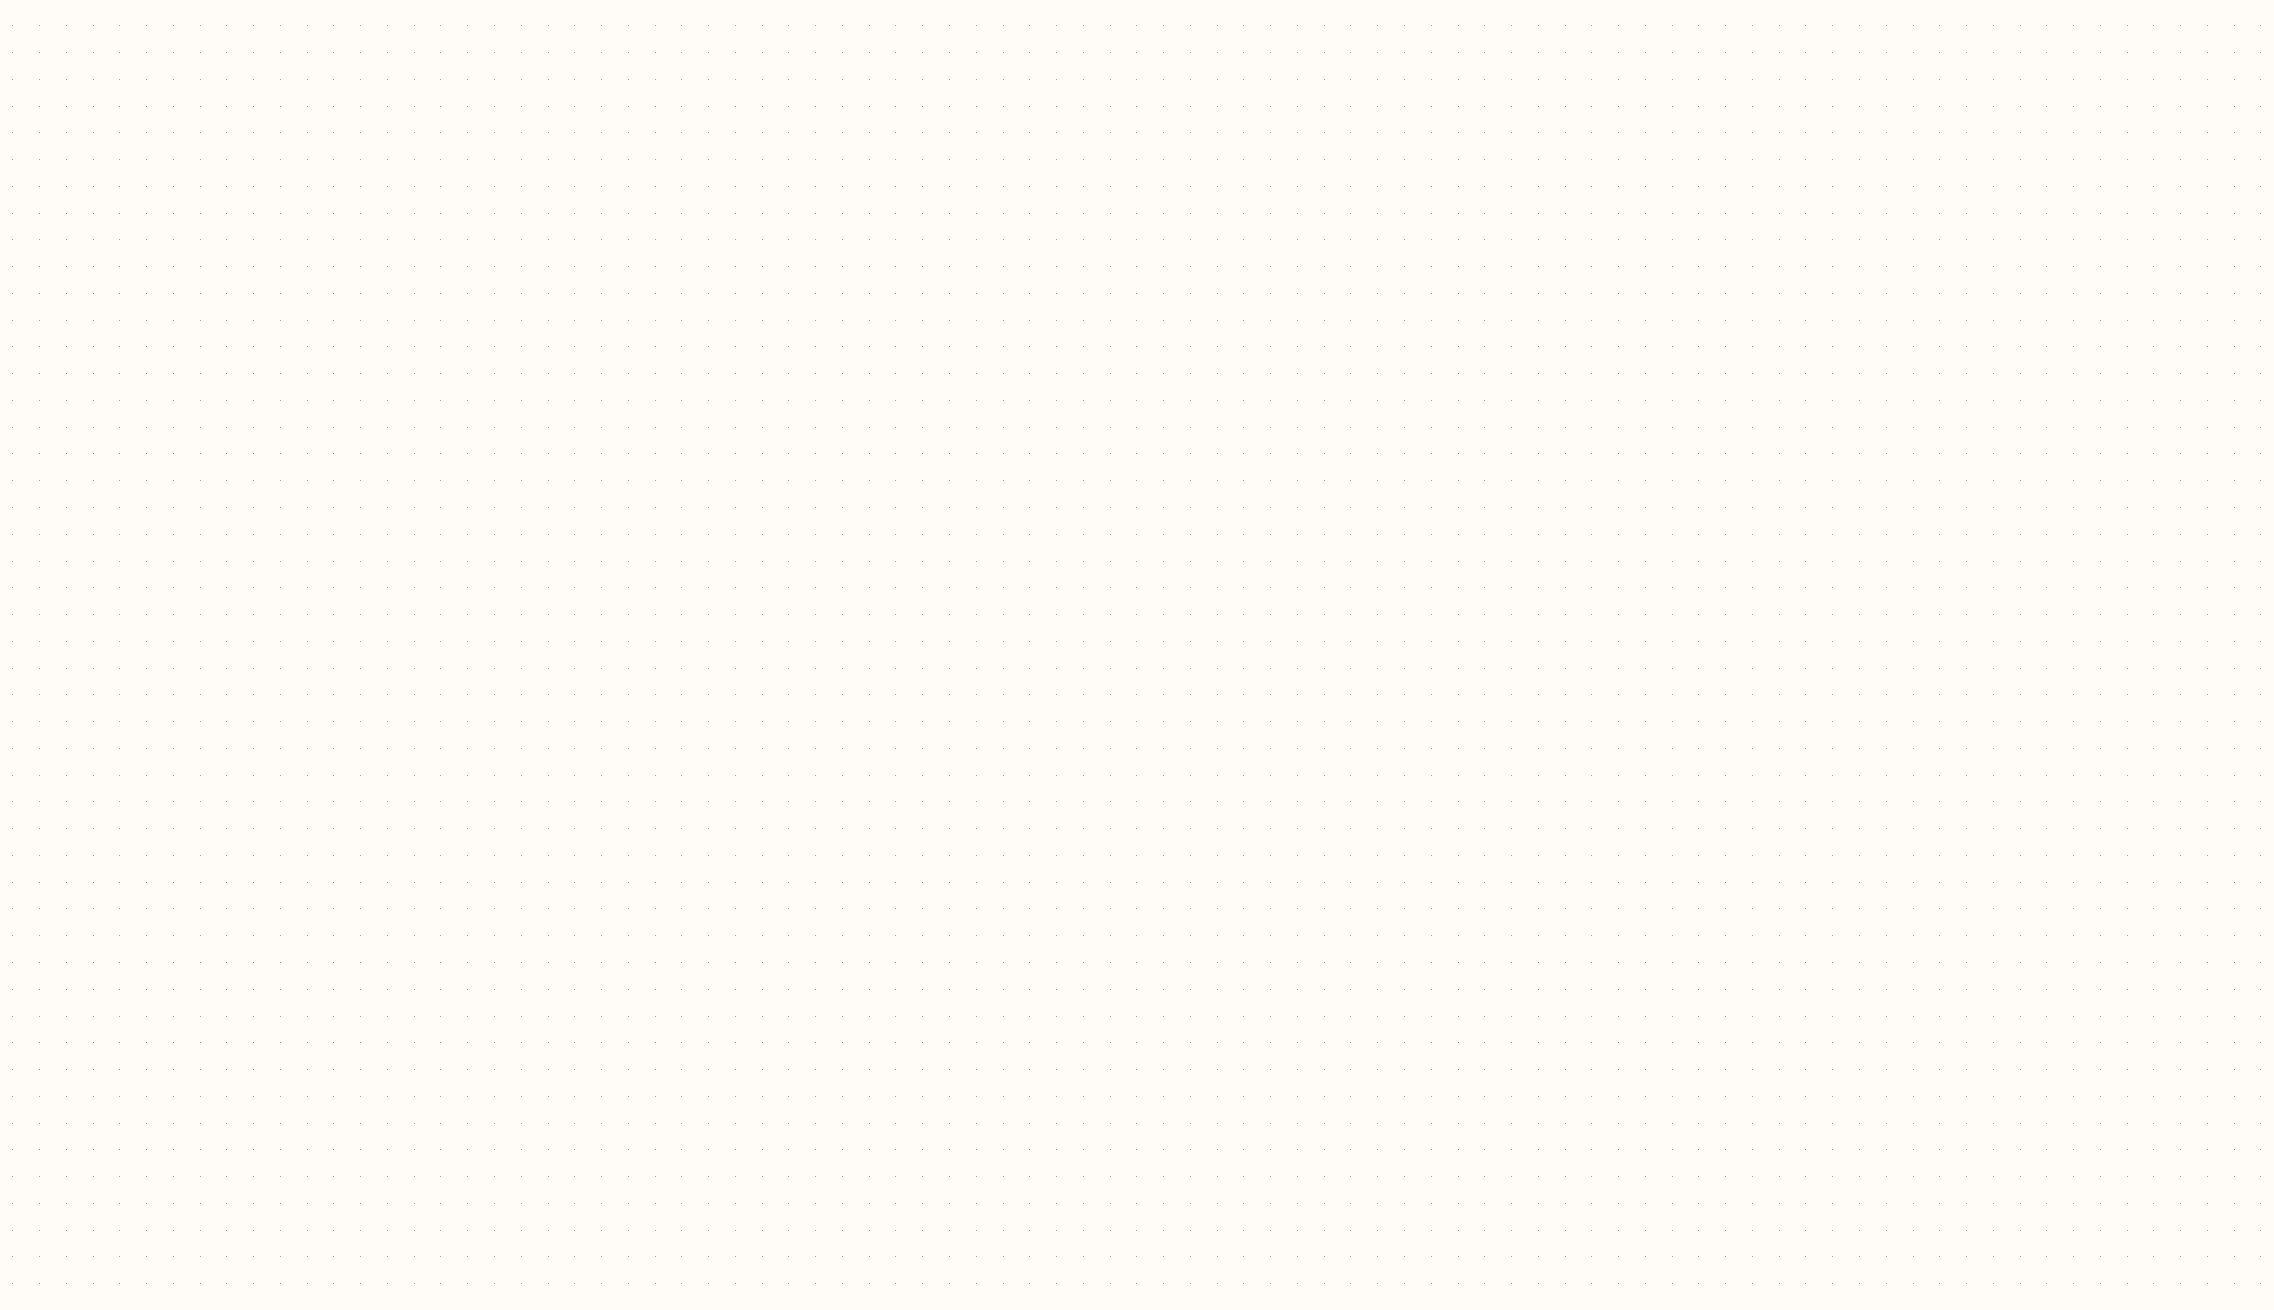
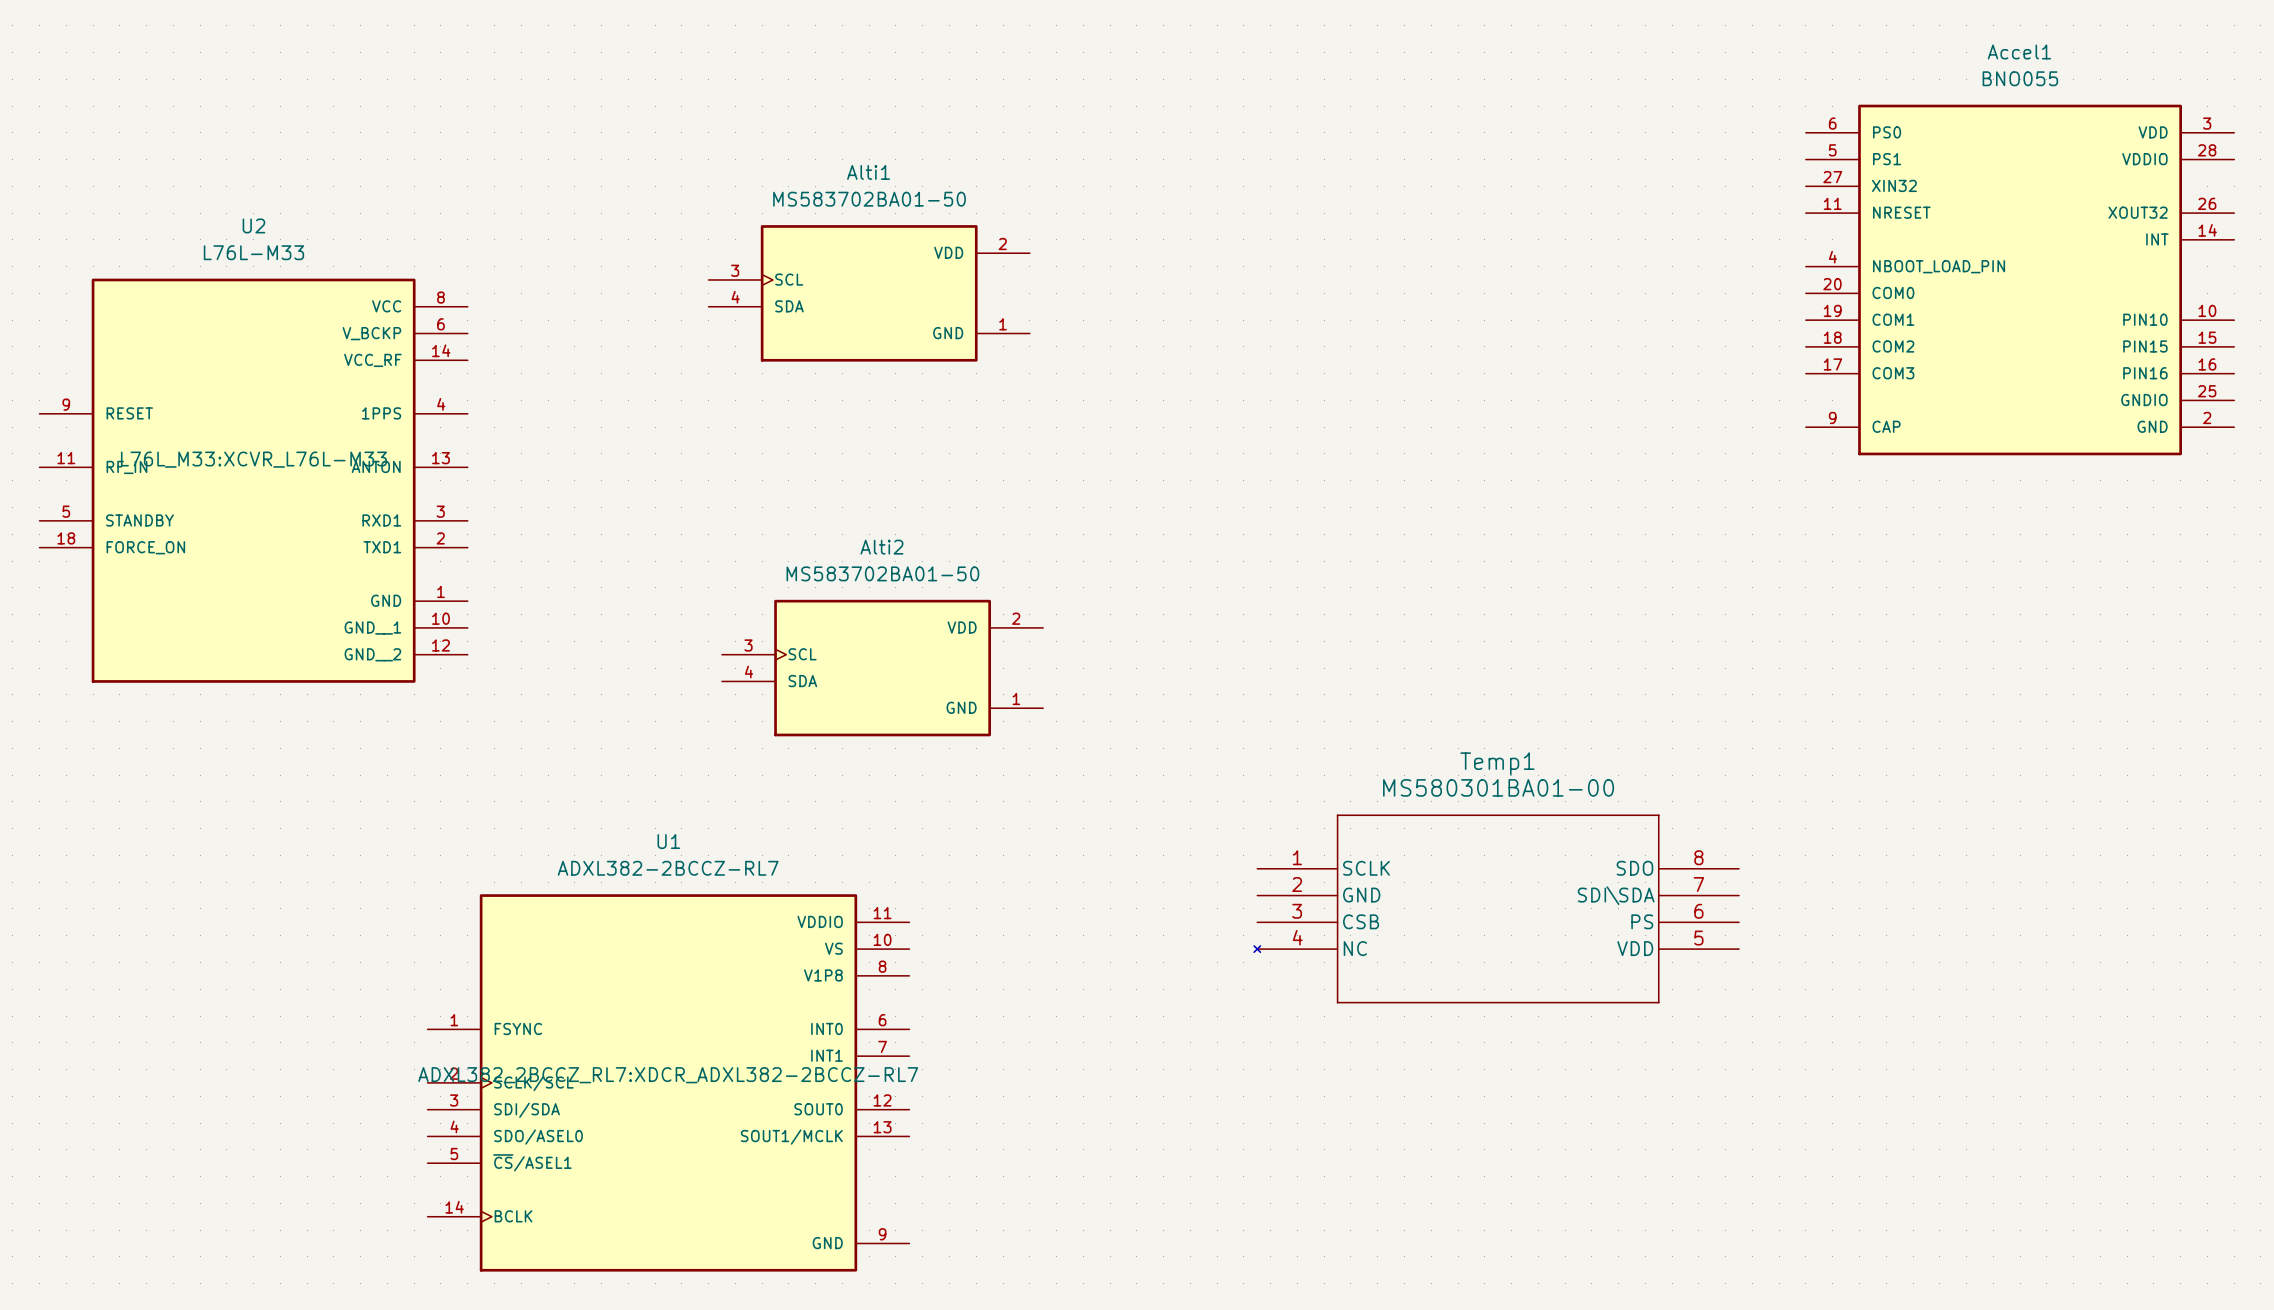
Accel1: none -> BNO055 (2020, 279)
Alti1: none -> MS583702BA01-50 (869, 293)
U2: none -> L76L-M33 (253, 480)
Alti2: none -> MS583702BA01-50 (882, 668)
Temp1: none -> MS580301BA01-00 (1496, 908)
U1: none -> ADXL382-2BCCZ-RL7 (668, 1082)

